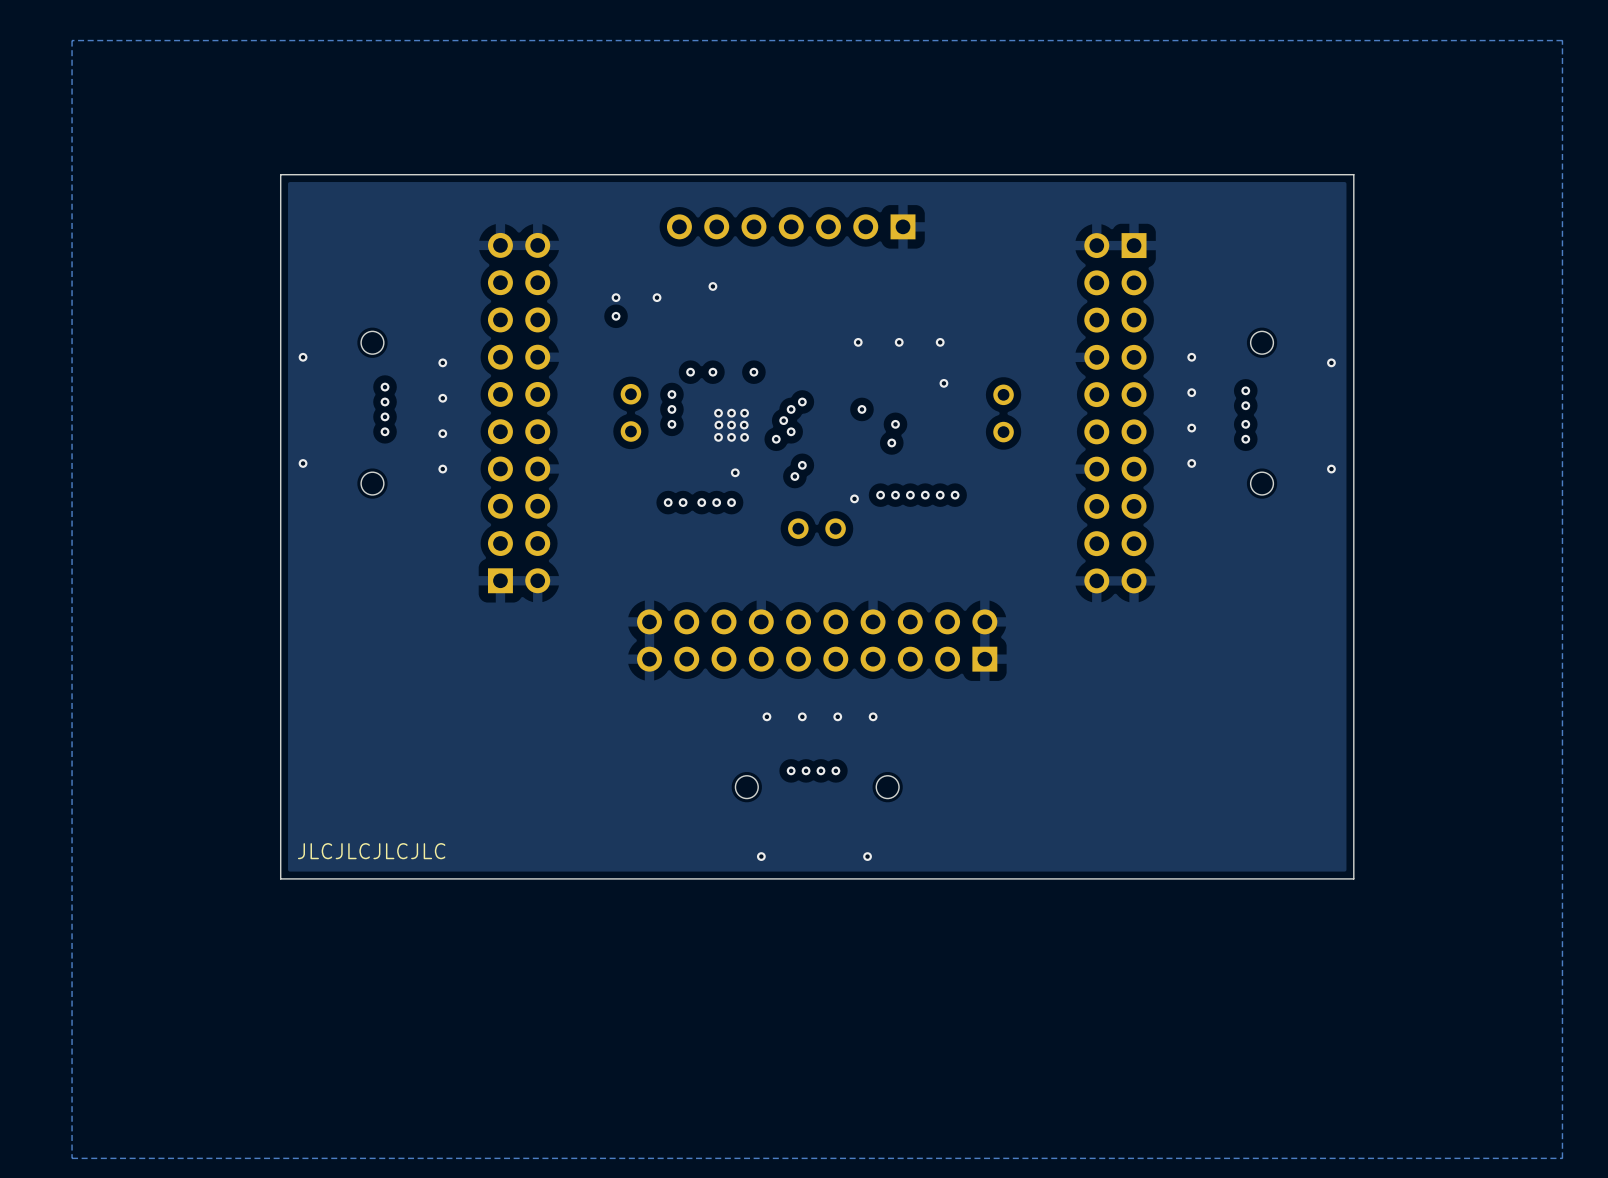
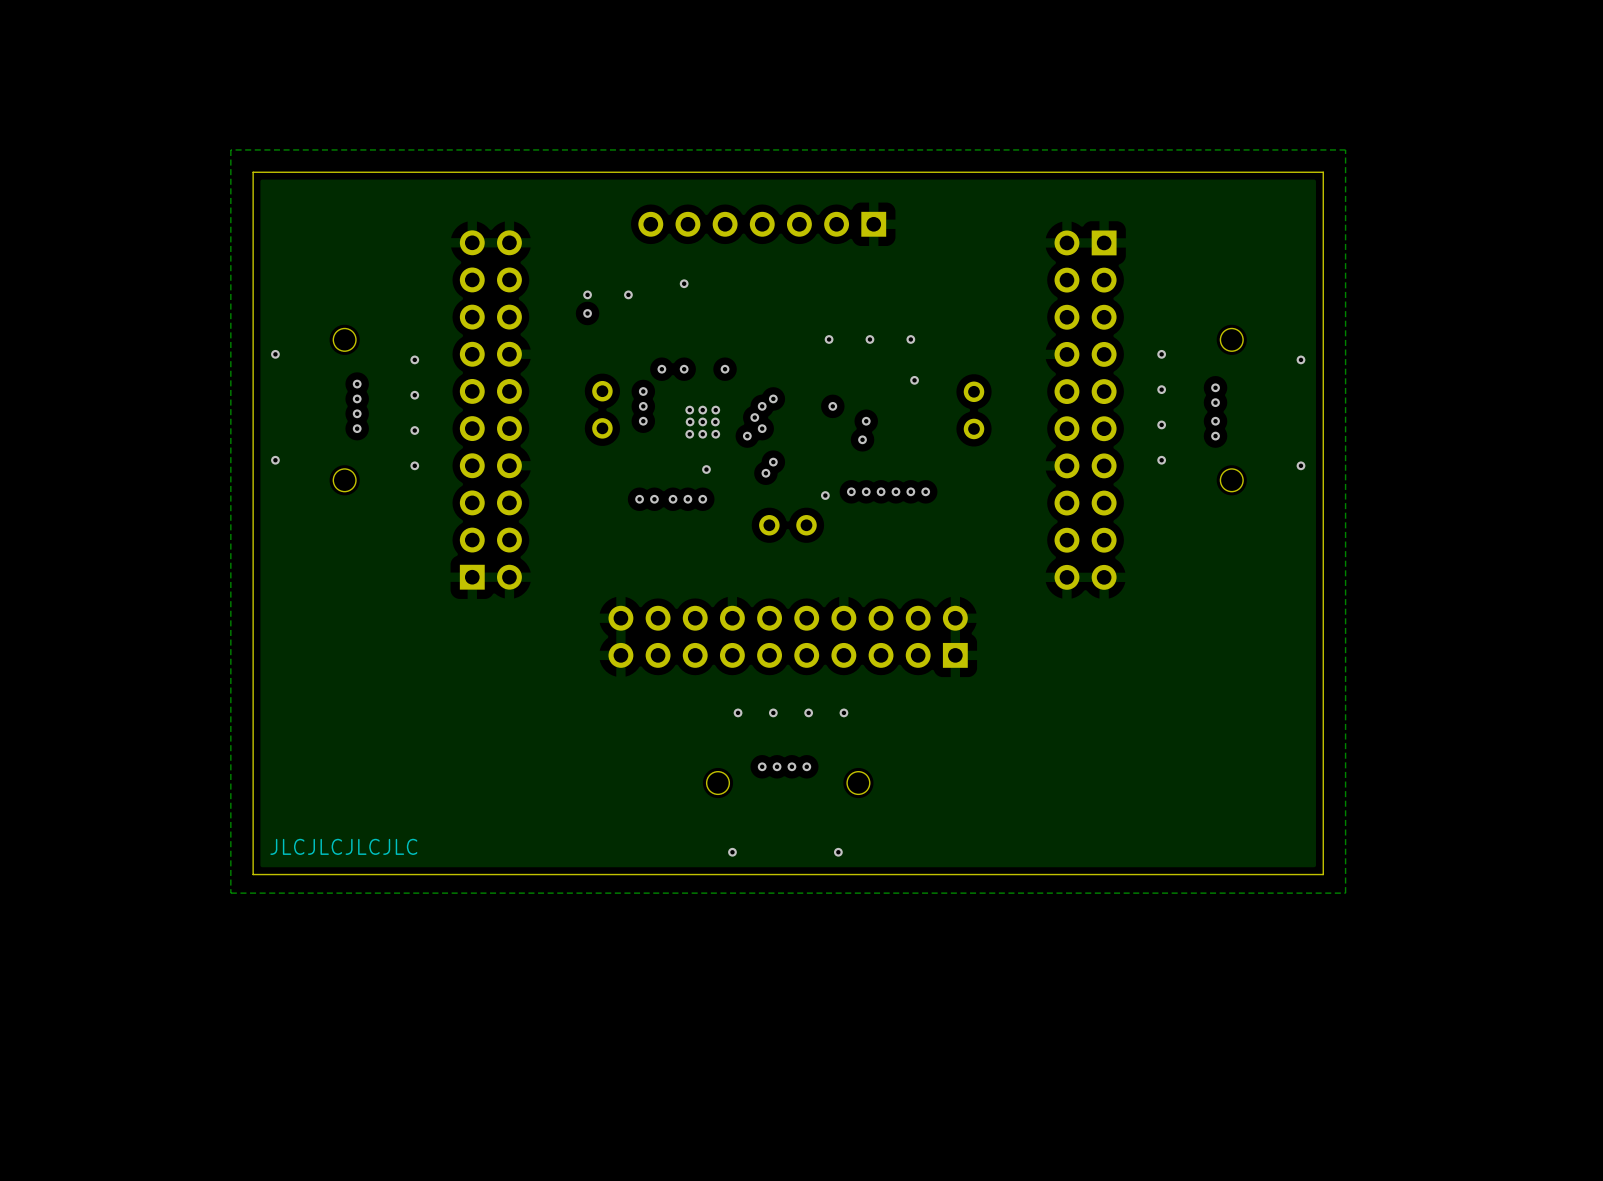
zone outline: (1562, 40) (72, 40) (72, 1158) (1562, 1158) (1562, 40) -> none
zone outline: none -> (1345, 149) (230, 149) (230, 893) (1345, 893) (1345, 149)

